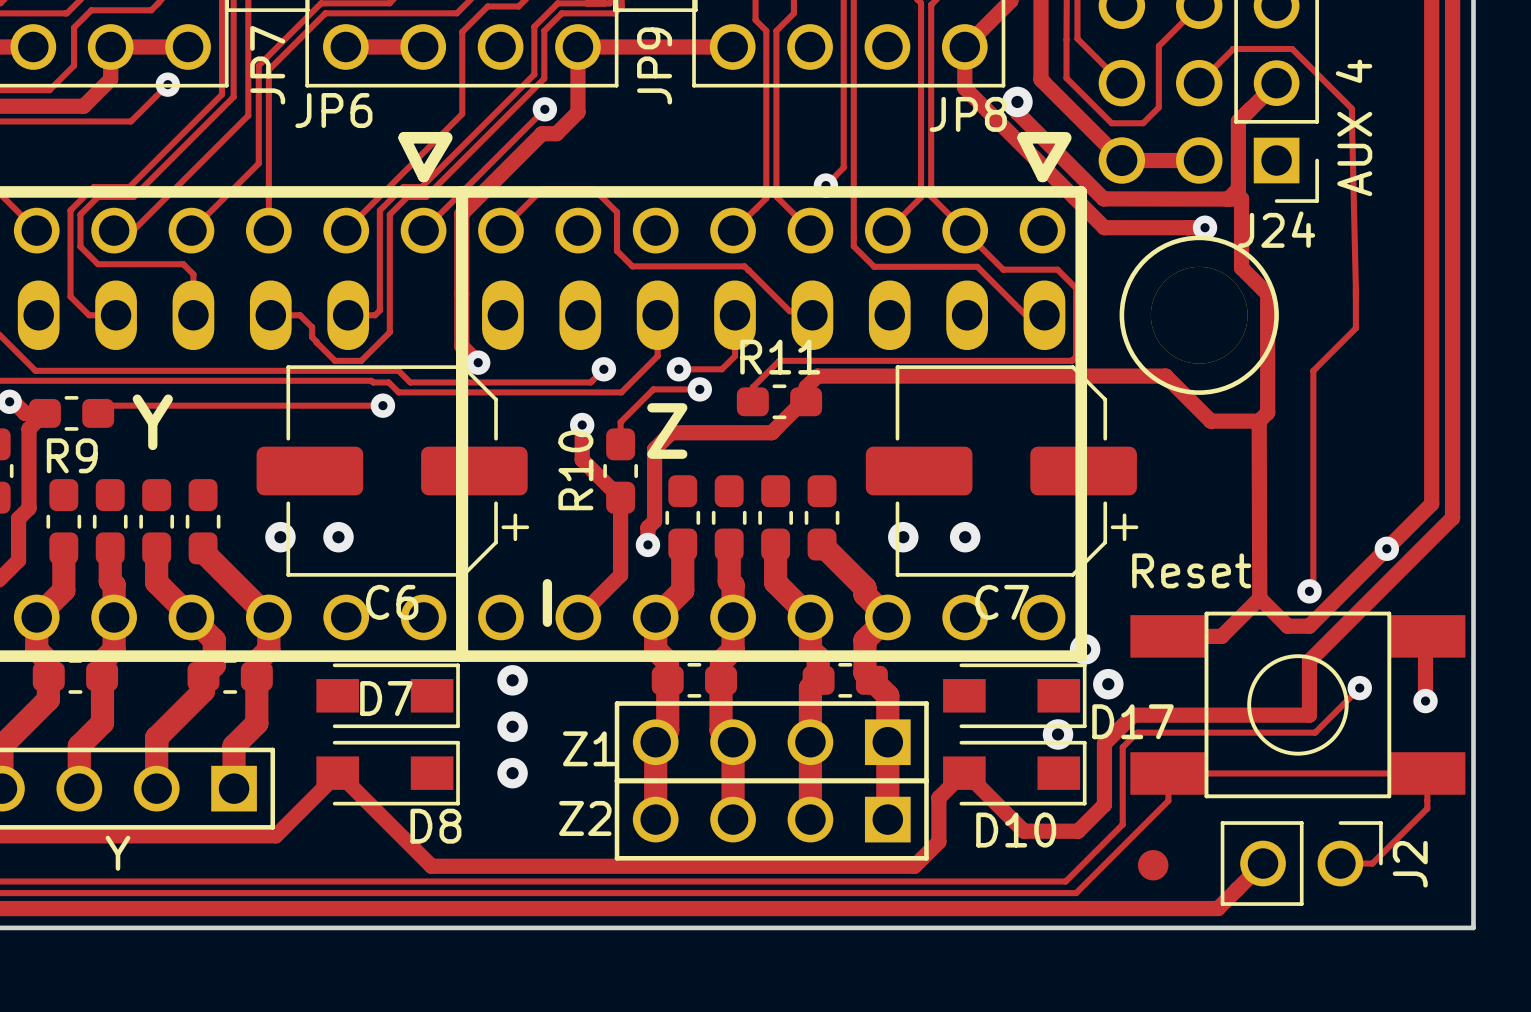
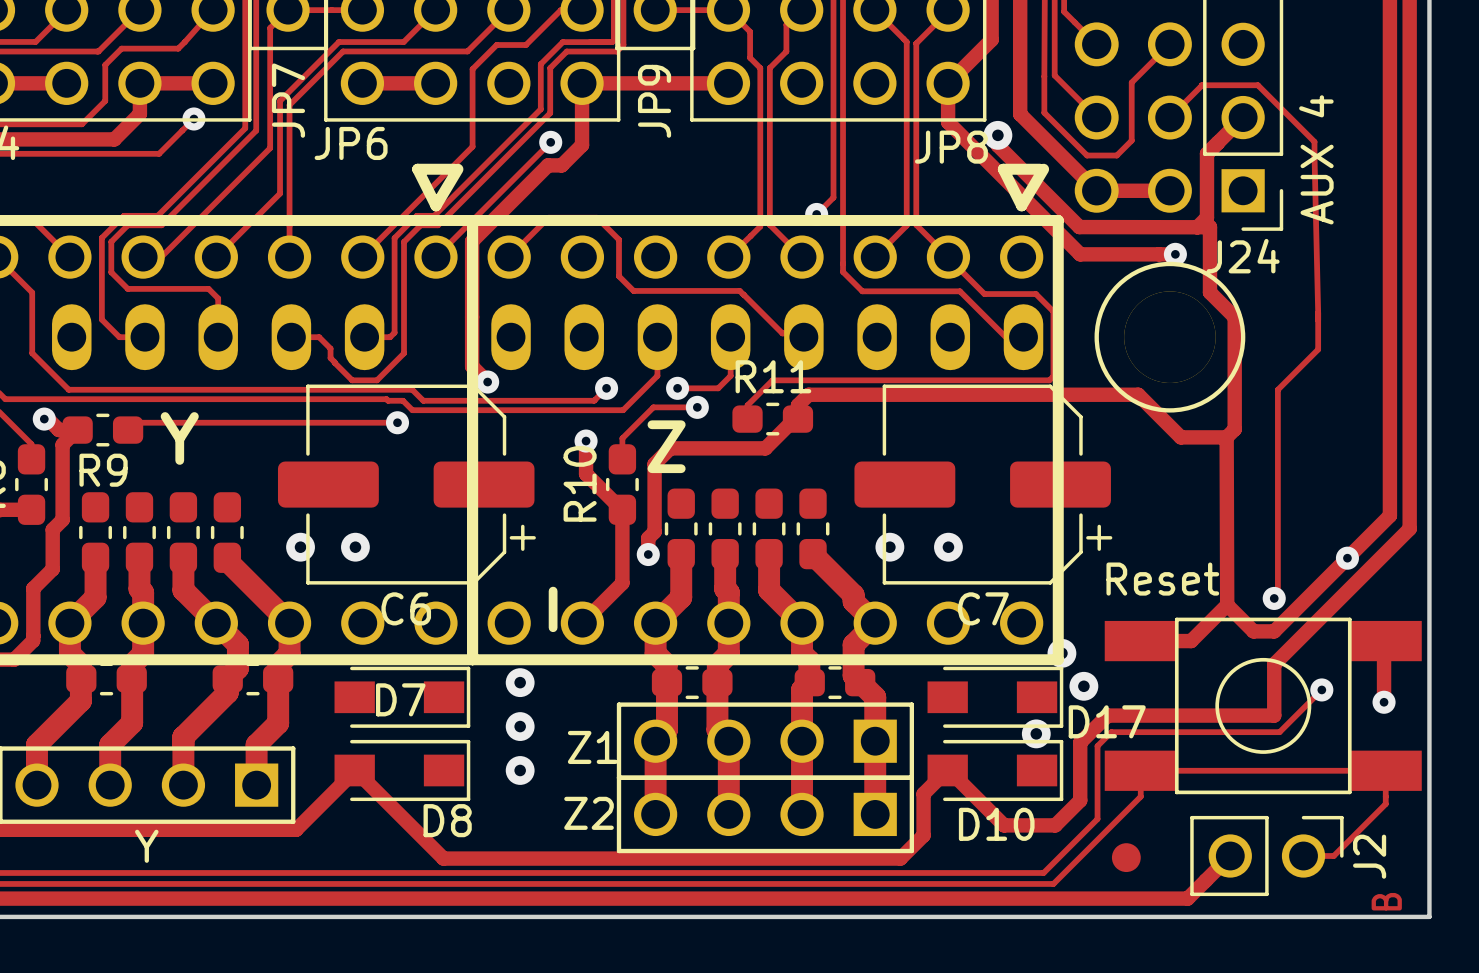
text: none -> B (1386, 901)

